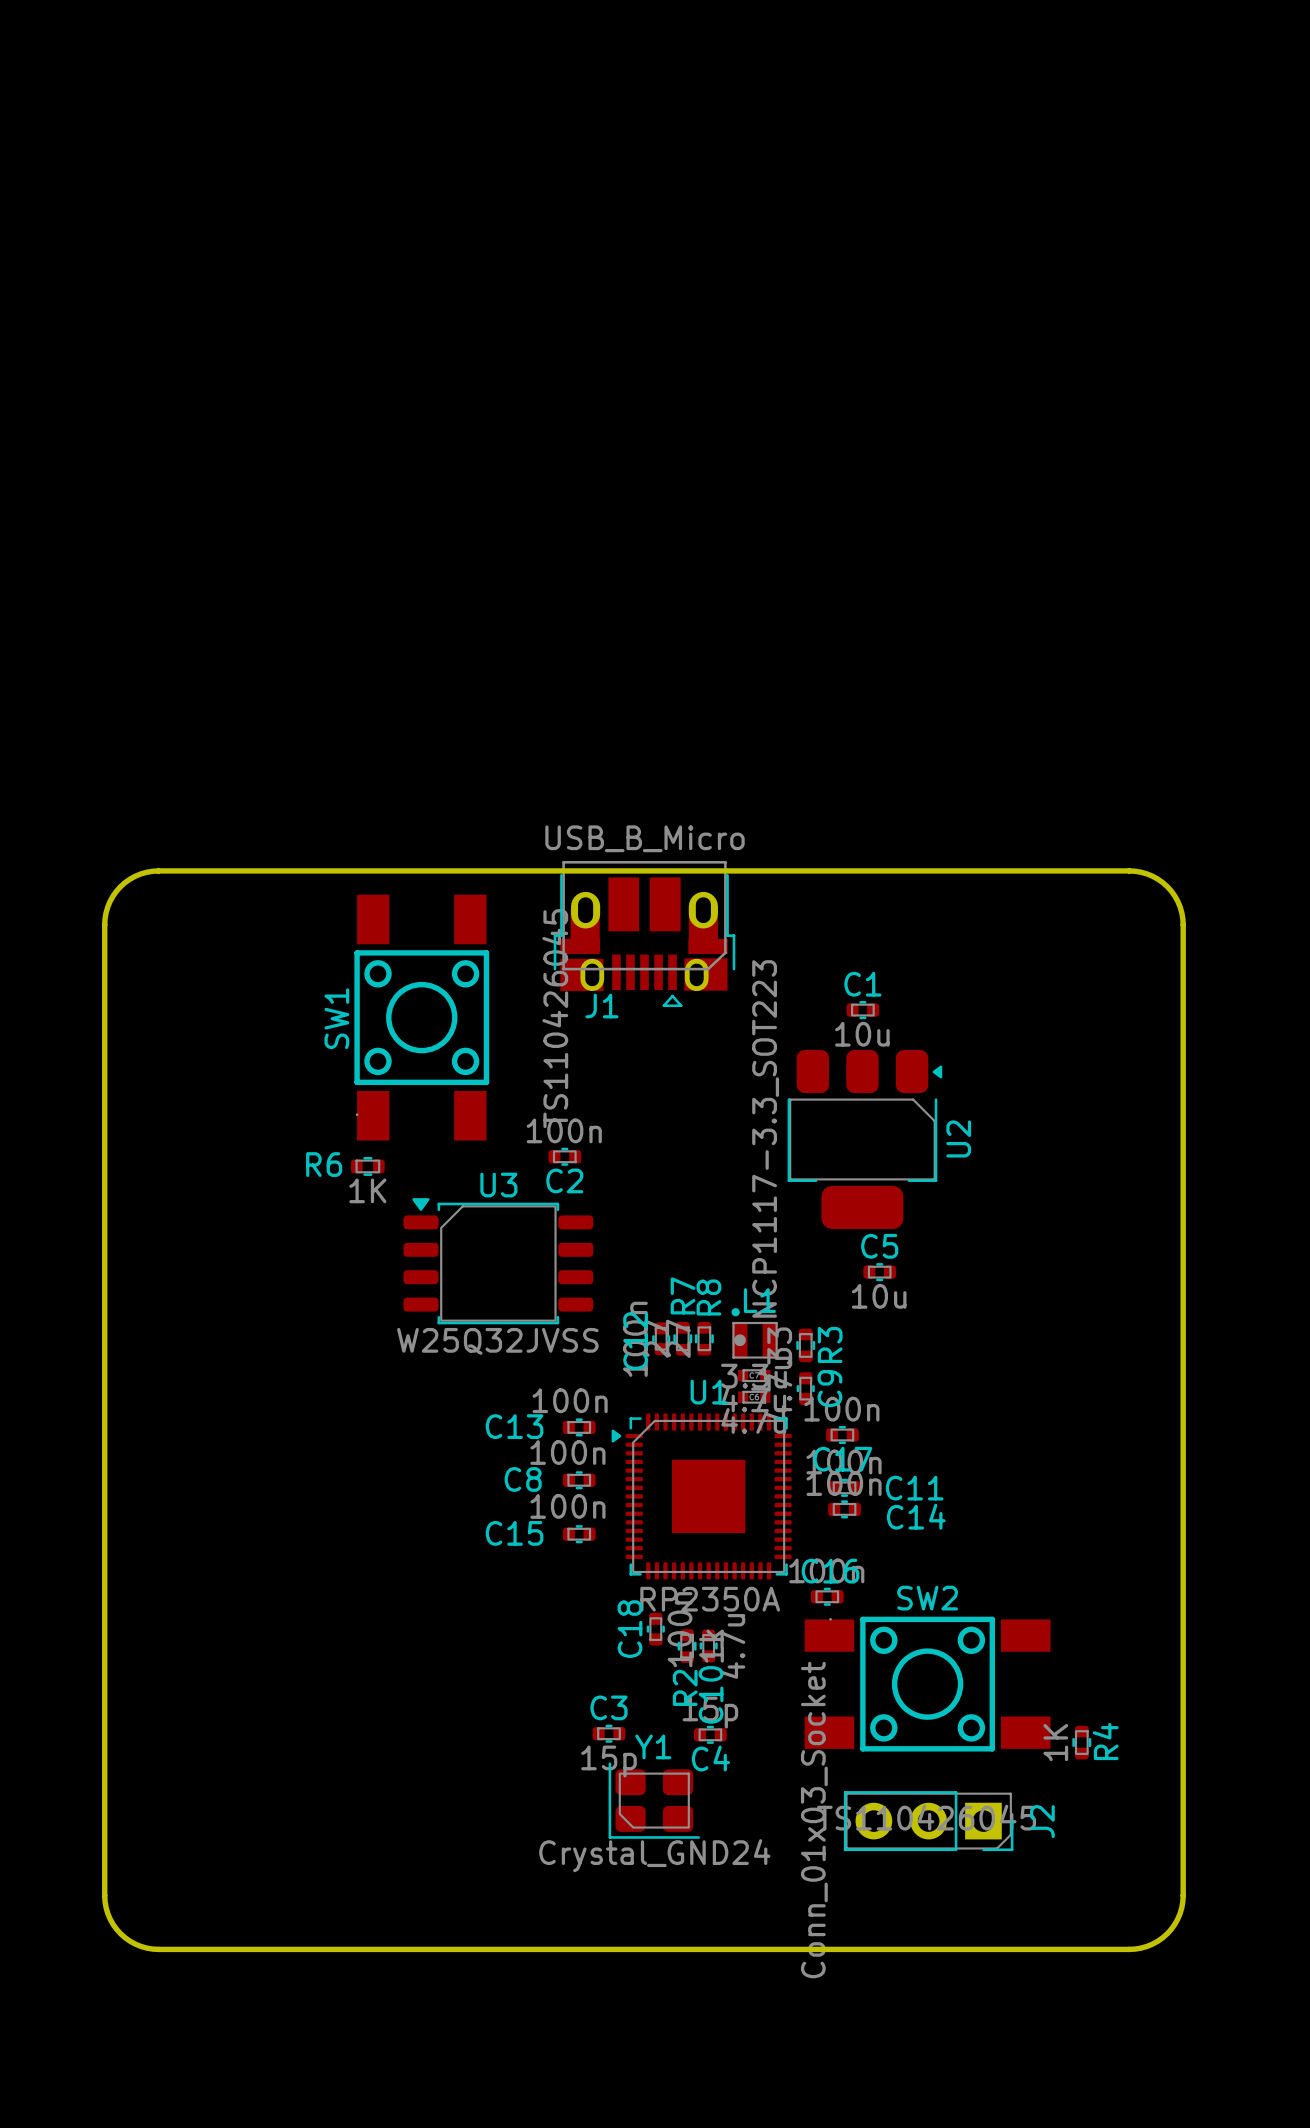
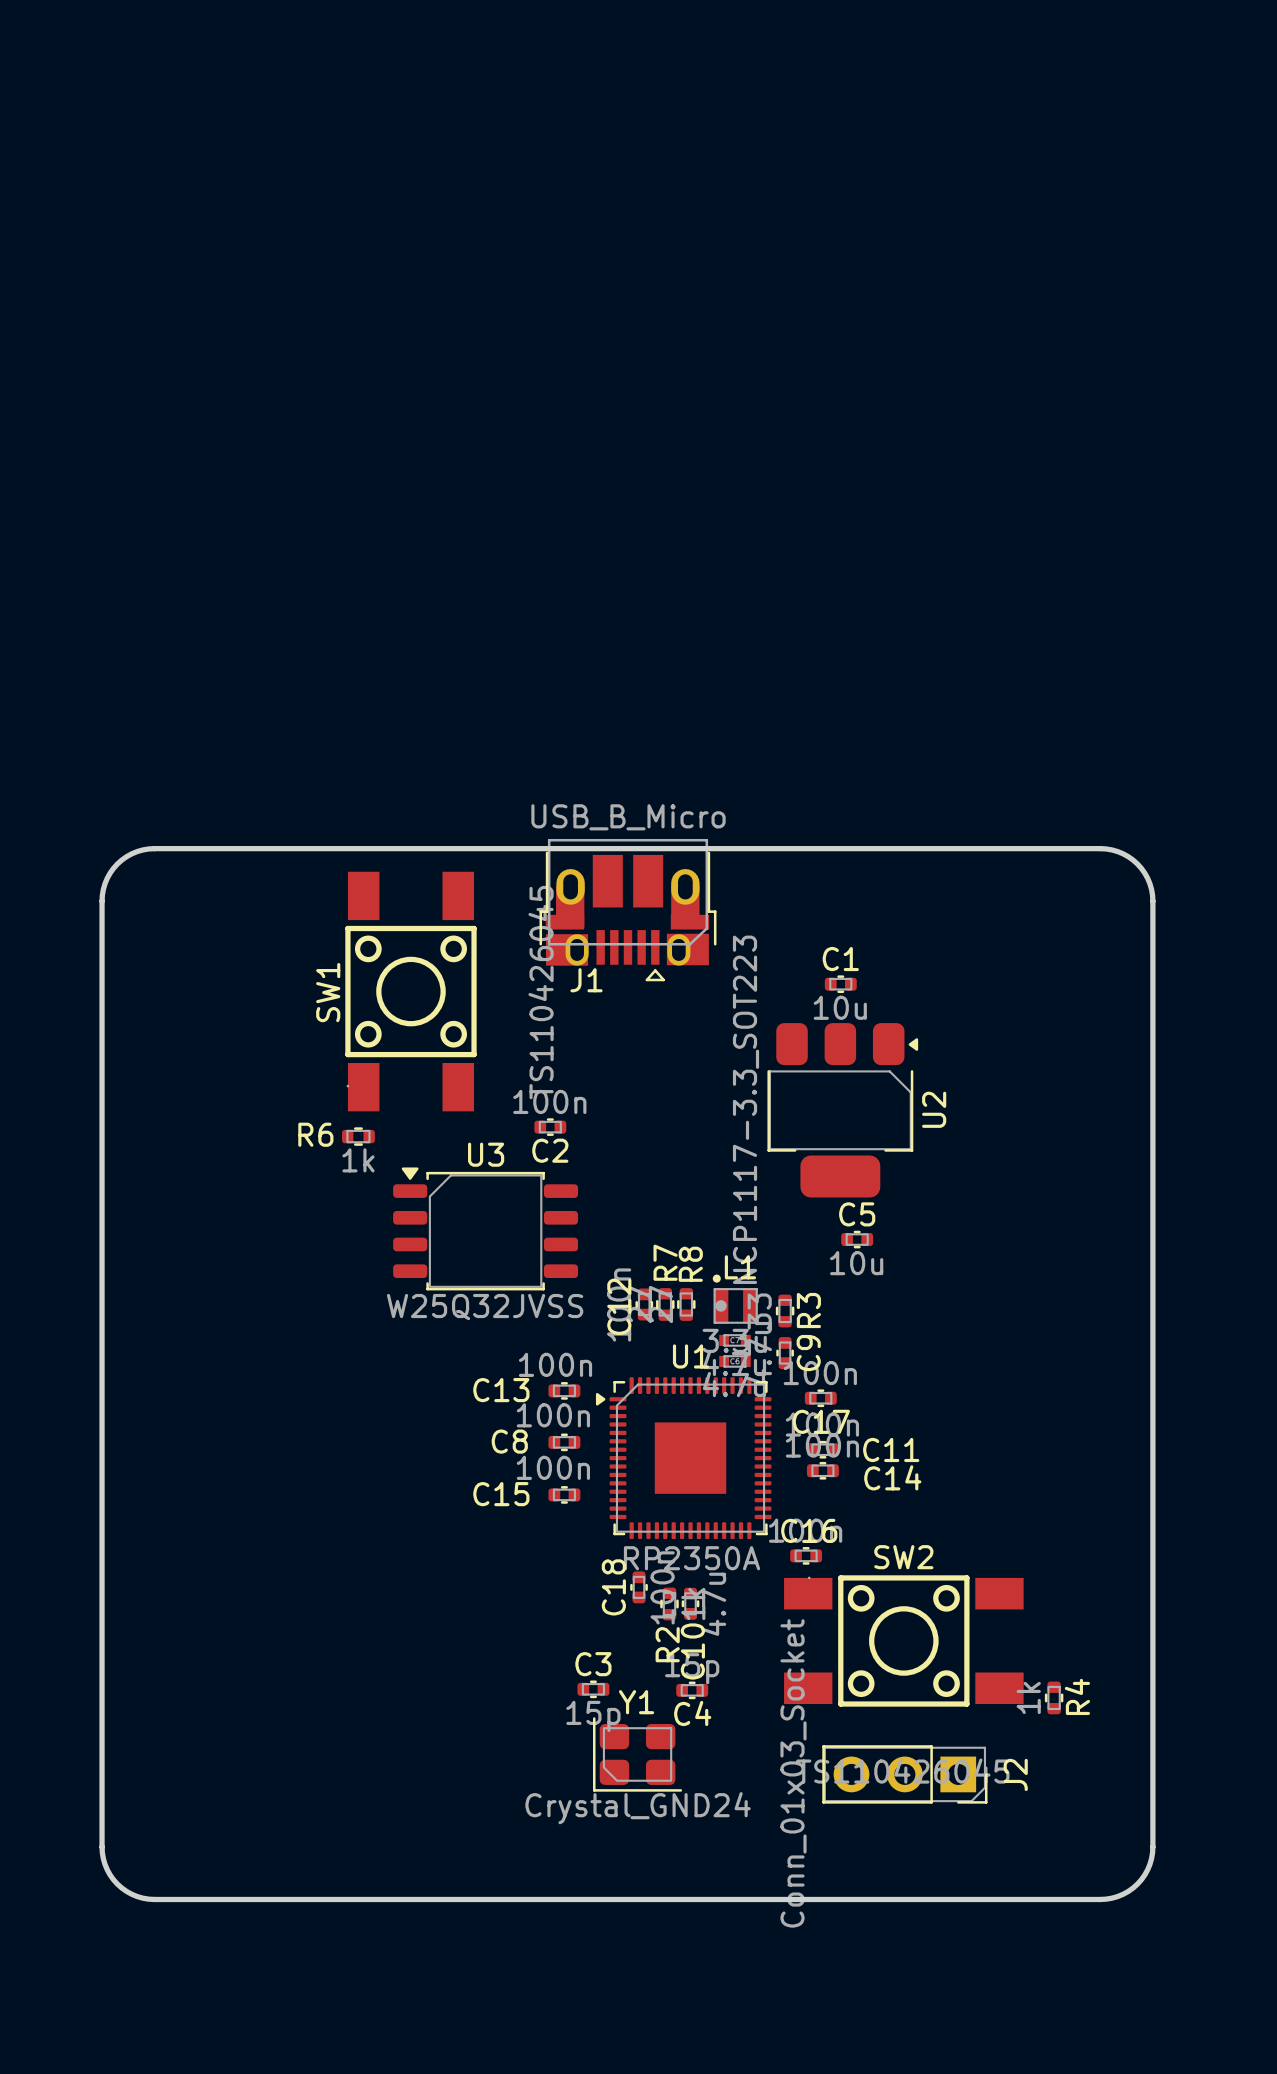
R6 value: 1K (367, 1190) -> 1k (358, 1160)
R4 value: 1K (1055, 1742) -> 1k (1028, 1697)

